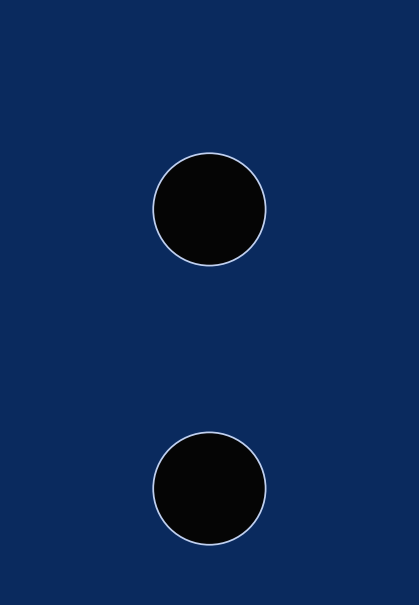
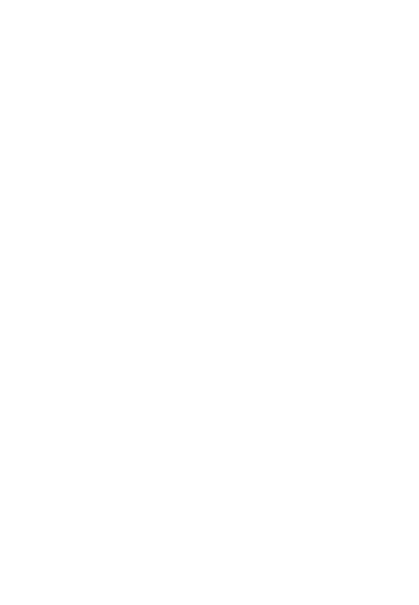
part: (209, 209) -> none
part: (209, 488) -> none

